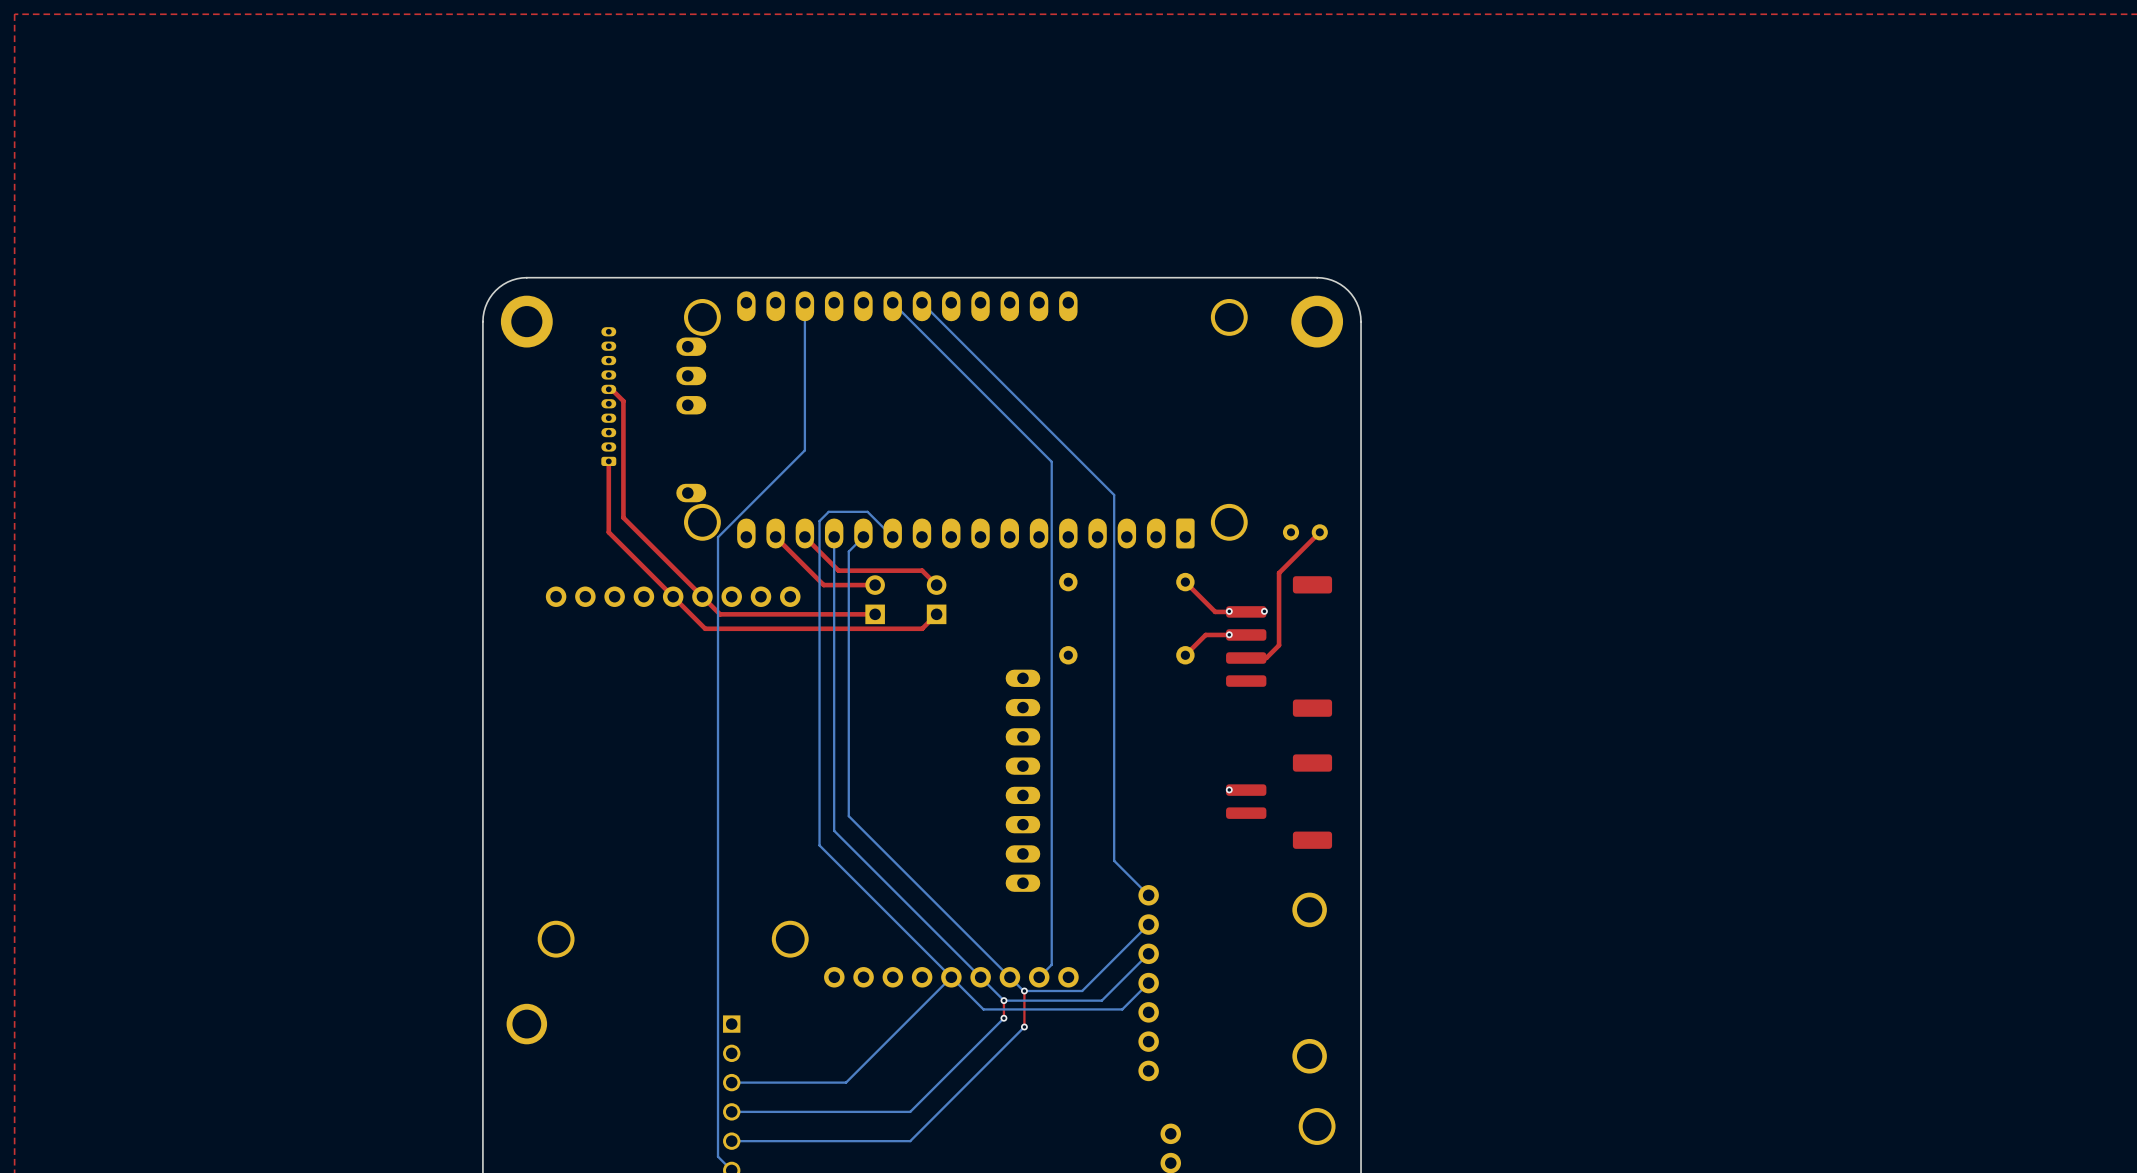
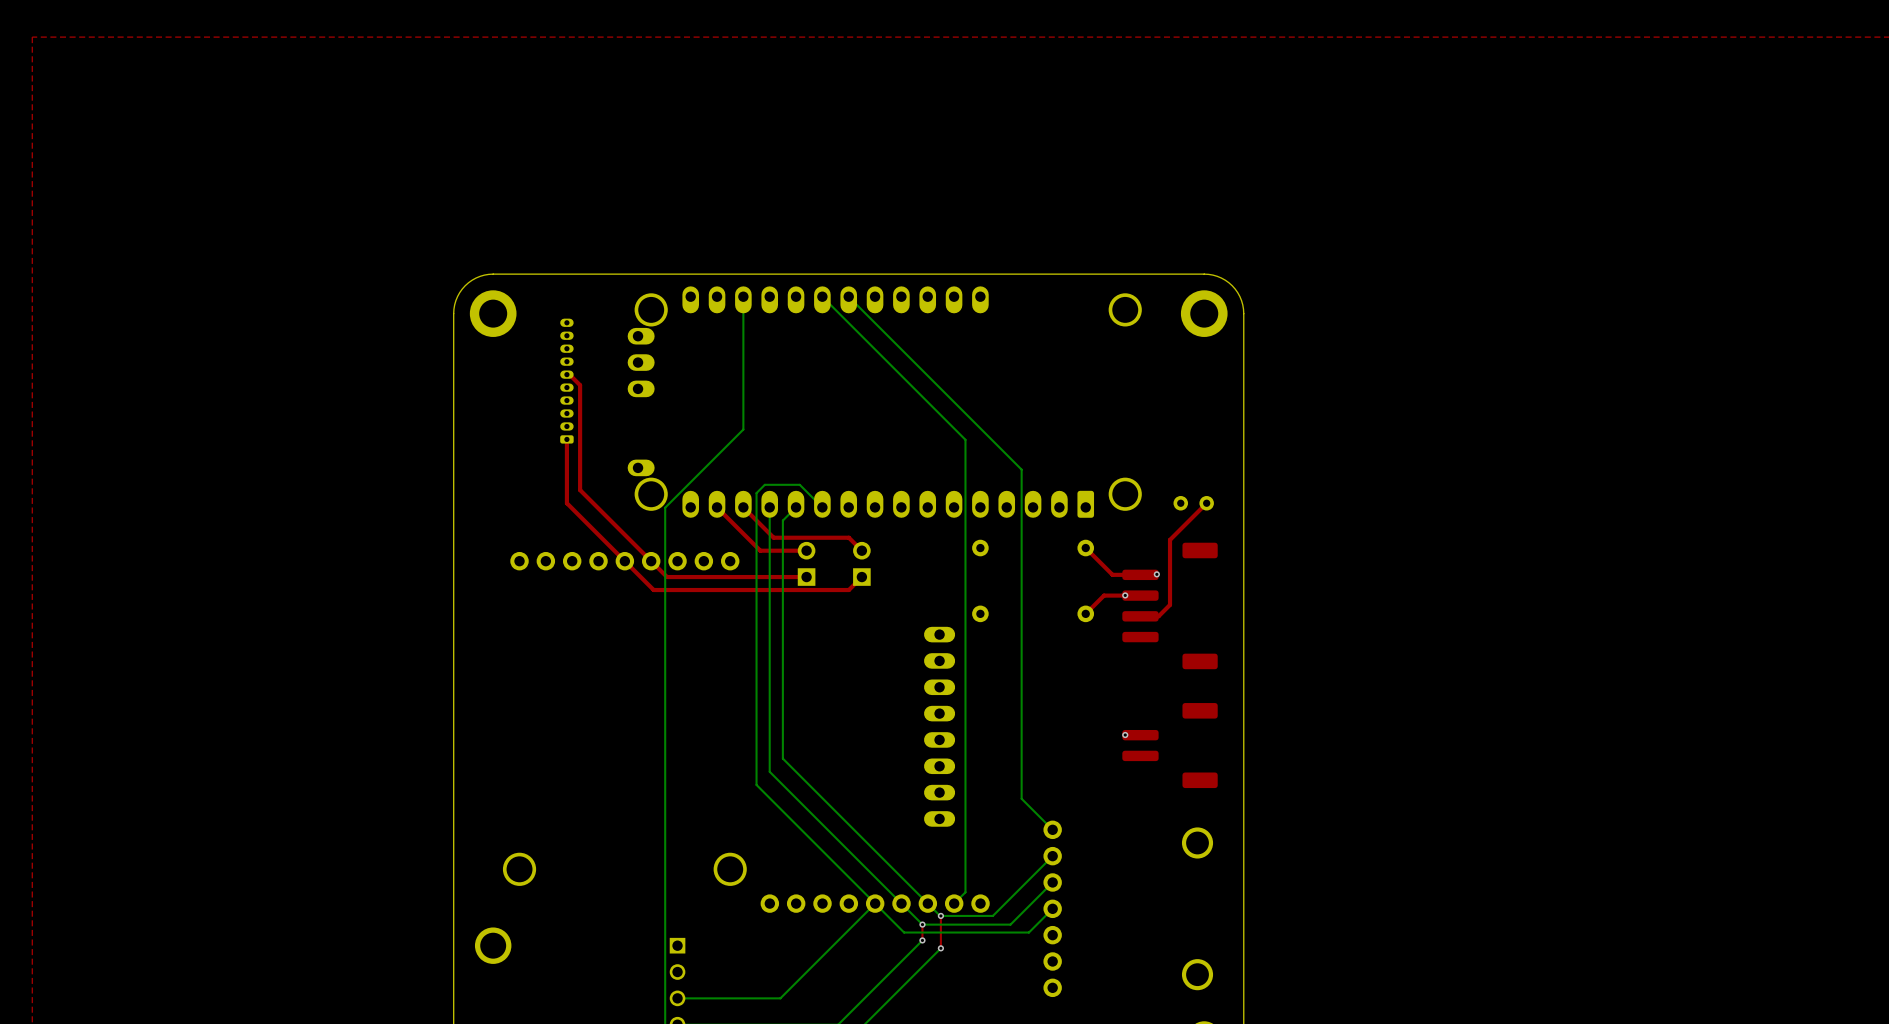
via: (1229, 611) -> none

